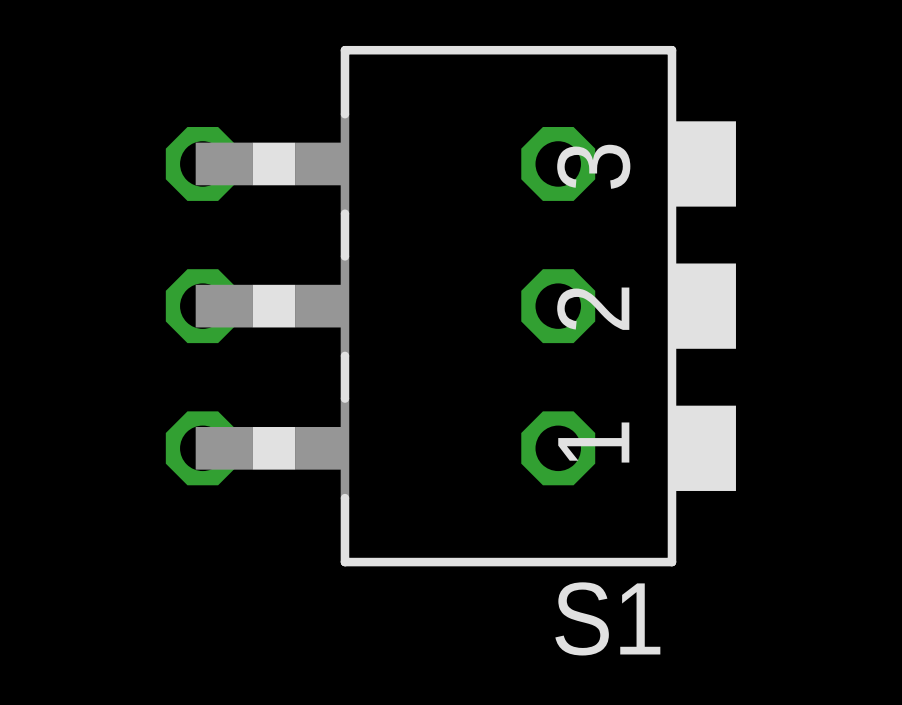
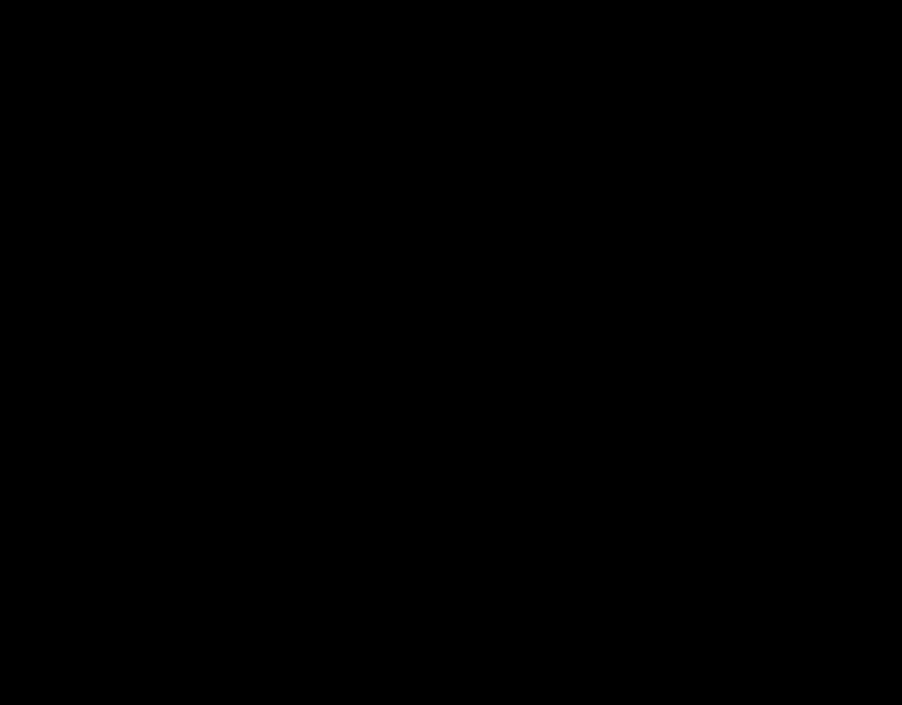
S1: (450, 306) -> none

